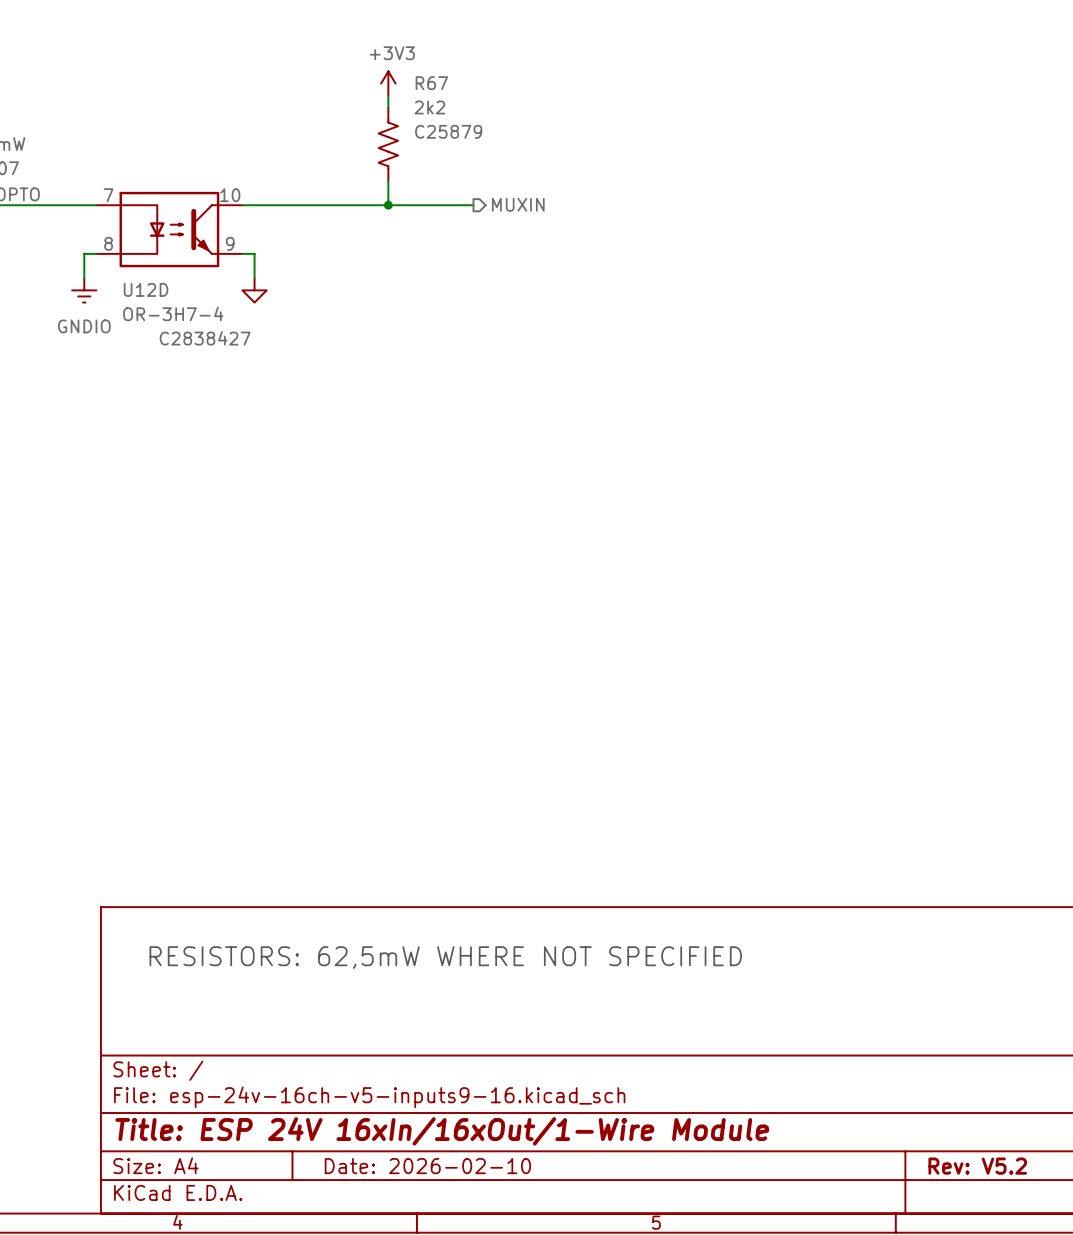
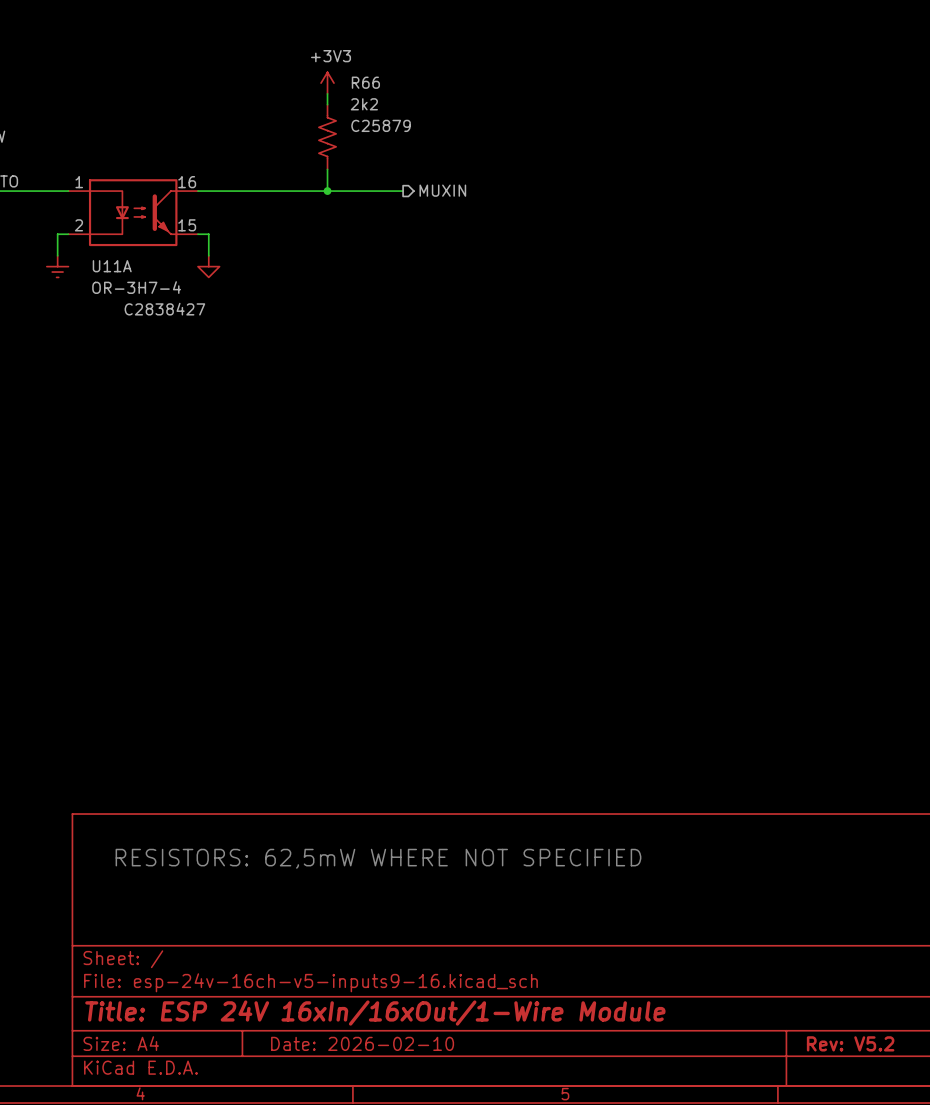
R67 name: R67 (431, 83) -> R66 (365, 82)
U12D pin number: 7 (108, 195) -> 1 (79, 182)
U12D pin number: 10 (230, 195) -> 16 (187, 182)
U12D pin number: 8 (108, 243) -> 2 (78, 225)
U12D pin number: 9 (230, 243) -> 15 (187, 225)
U12D name: U12D (146, 289) -> U11A (112, 266)
power symbol text: GNDIO (84, 326) -> none

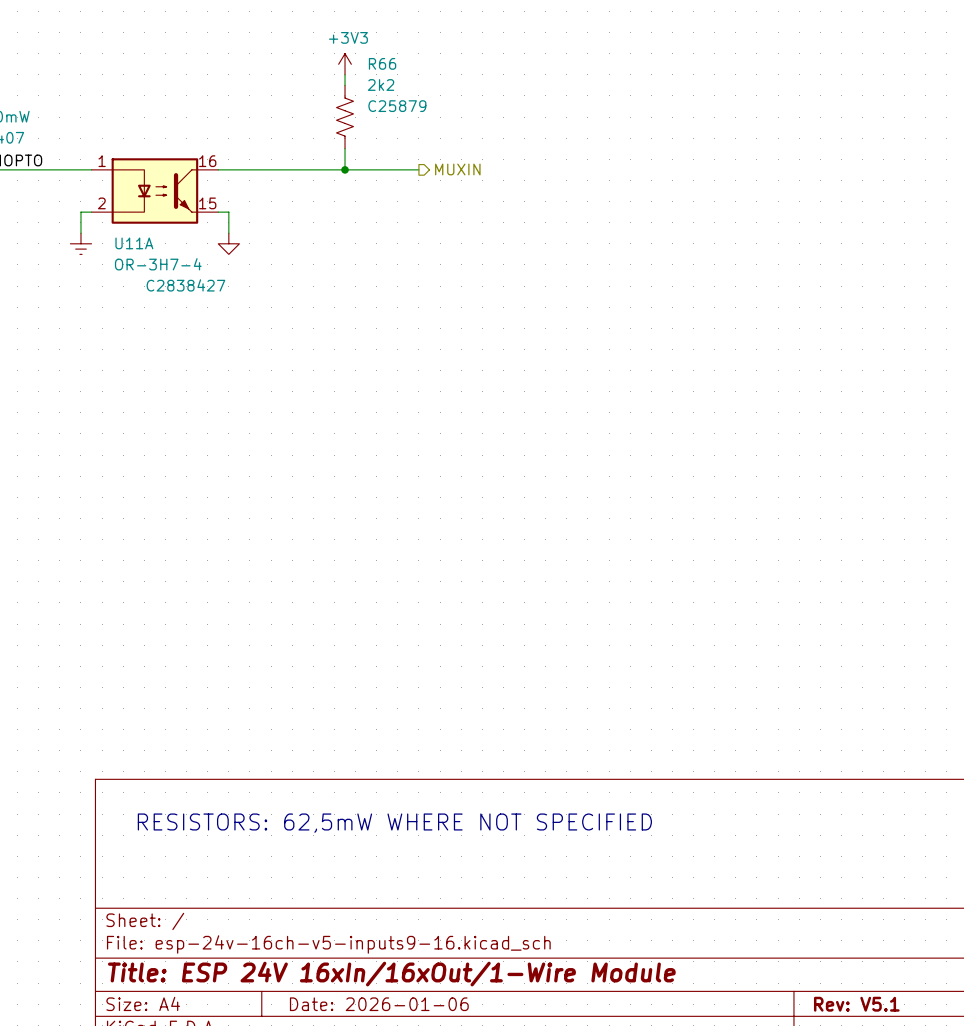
title block: Date: 2026-02-10 (362, 1043) -> Date: 2026-01-06 (379, 1004)
title block: Rev: V5.2 (850, 1043) -> Rev: V5.1 (856, 1004)

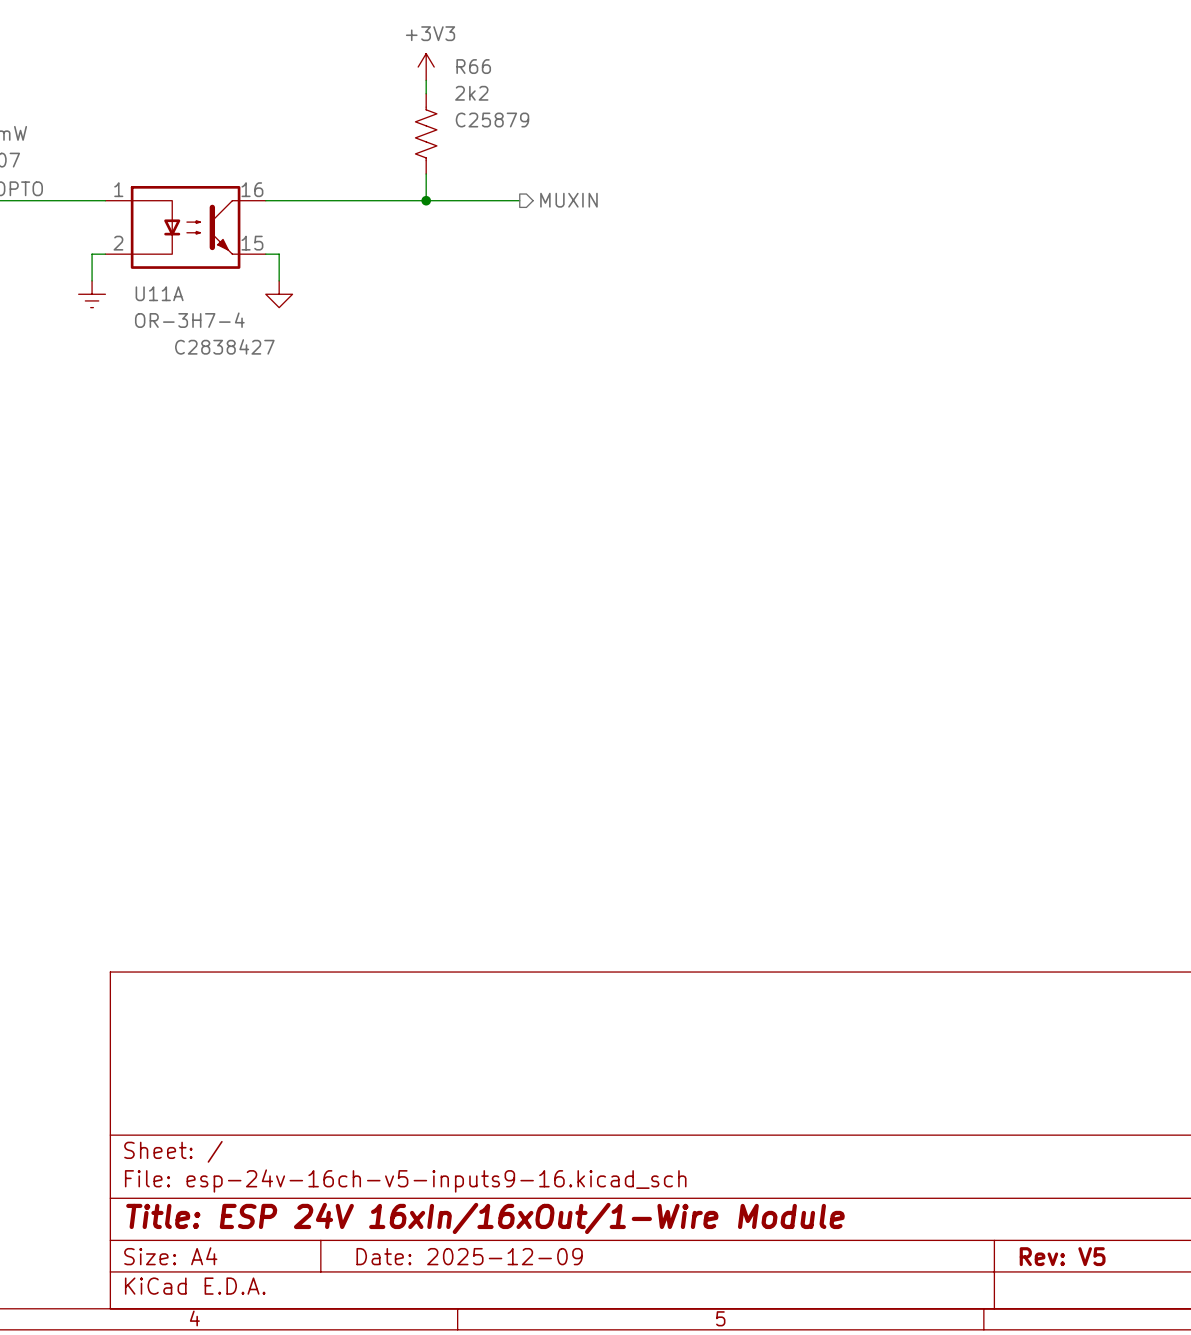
text: RESISTORS: 62,5mW WHERE NOT SPECIFIED (394, 823) -> none
title block: Date: 2026-01-06 (379, 1004) -> Date: 2025-12-09 (469, 1256)
title block: Rev: V5.1 (856, 1004) -> Rev: V5 (1062, 1256)

